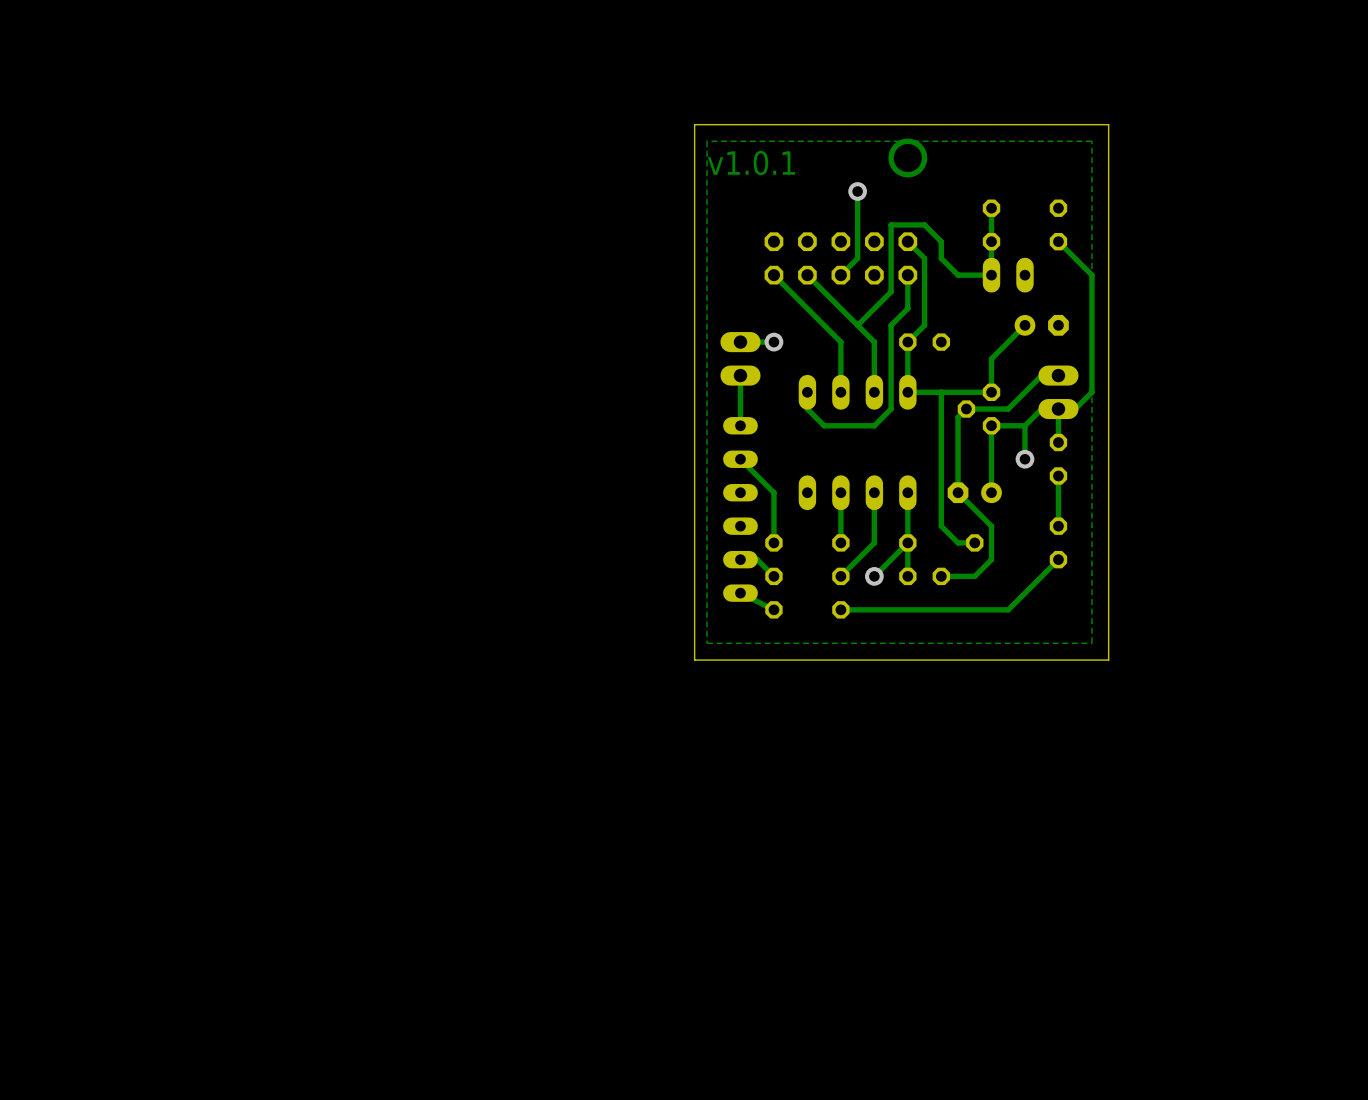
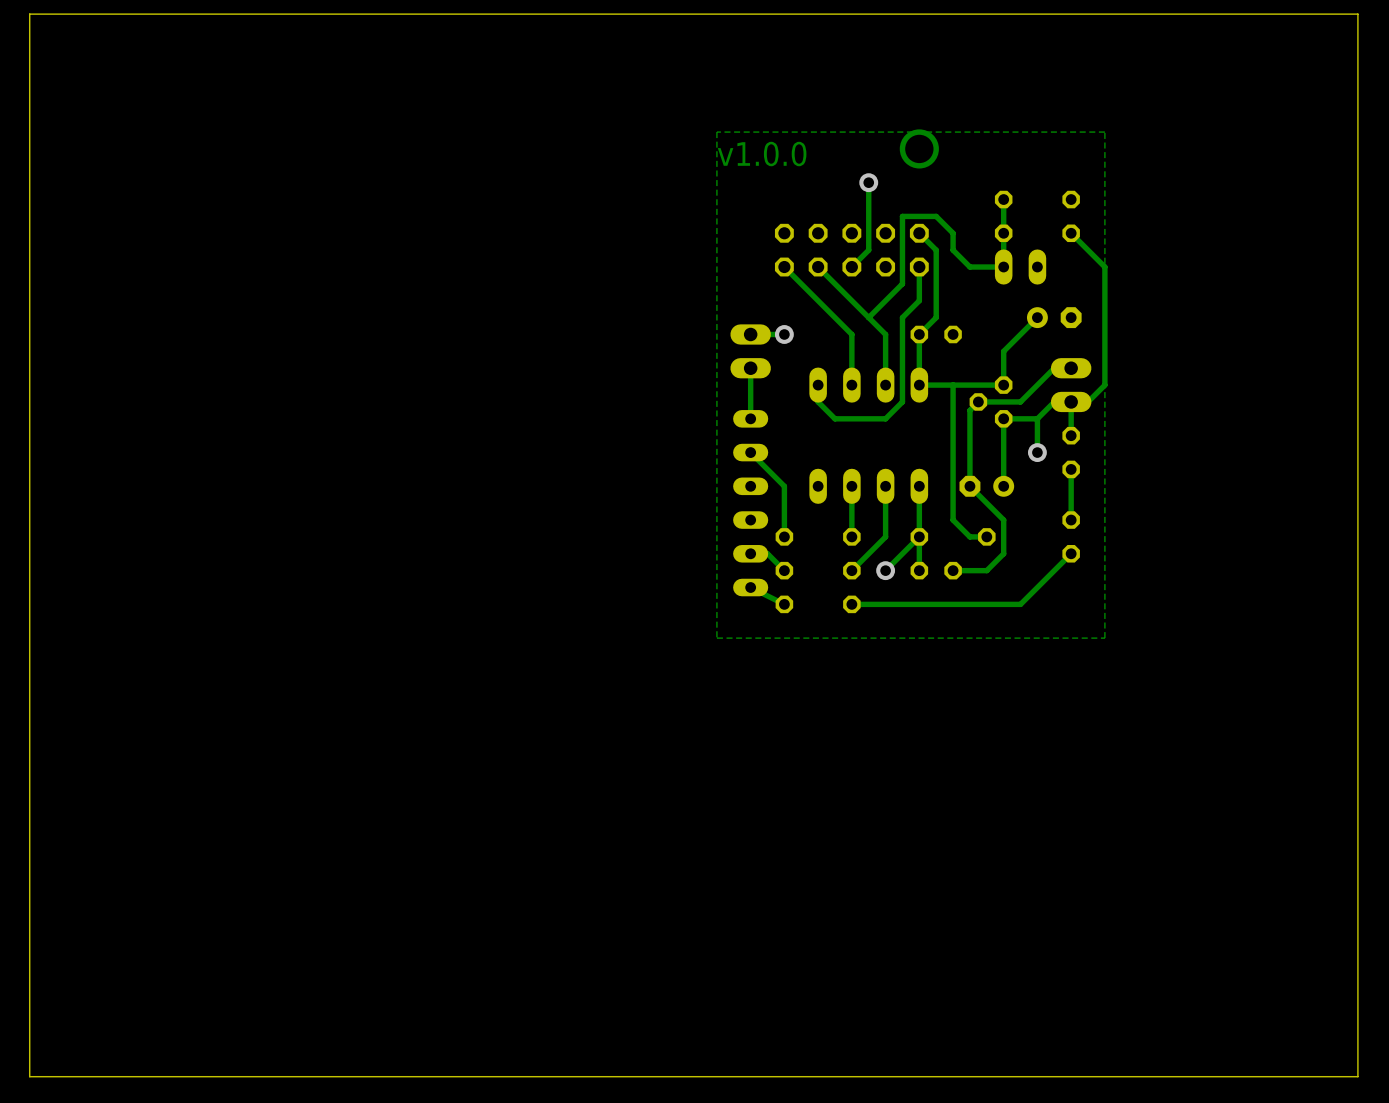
board edge: none -> (1357, 14) (29, 14) (29, 1076) (1357, 1076) (1357, 14)
board edge: (1108, 124) (694, 124) (694, 660) (1108, 660) (1108, 124) -> none
text: v1.0.1 (751, 163) -> v1.0.0 (762, 154)

